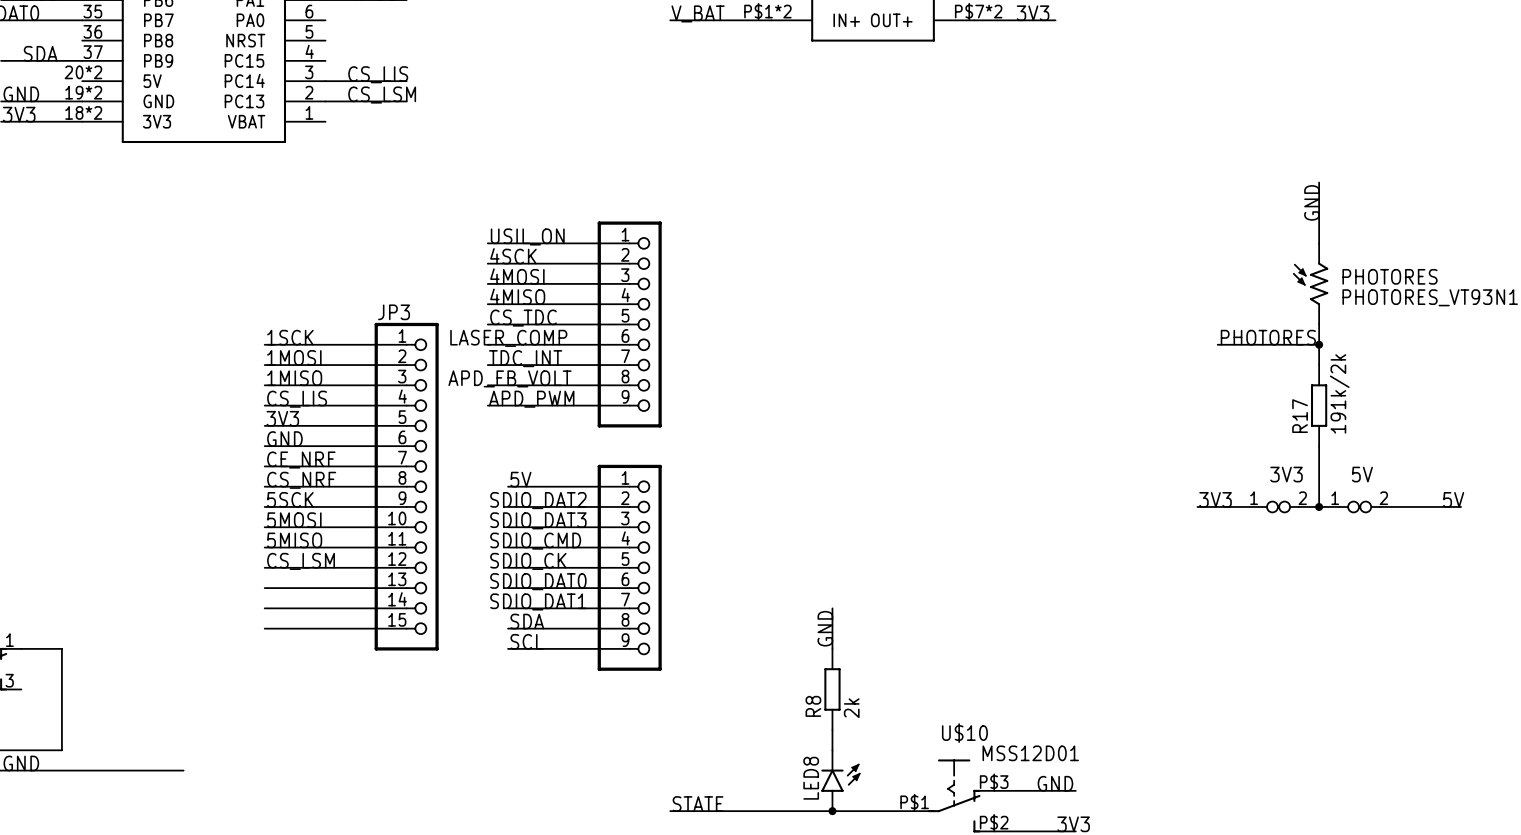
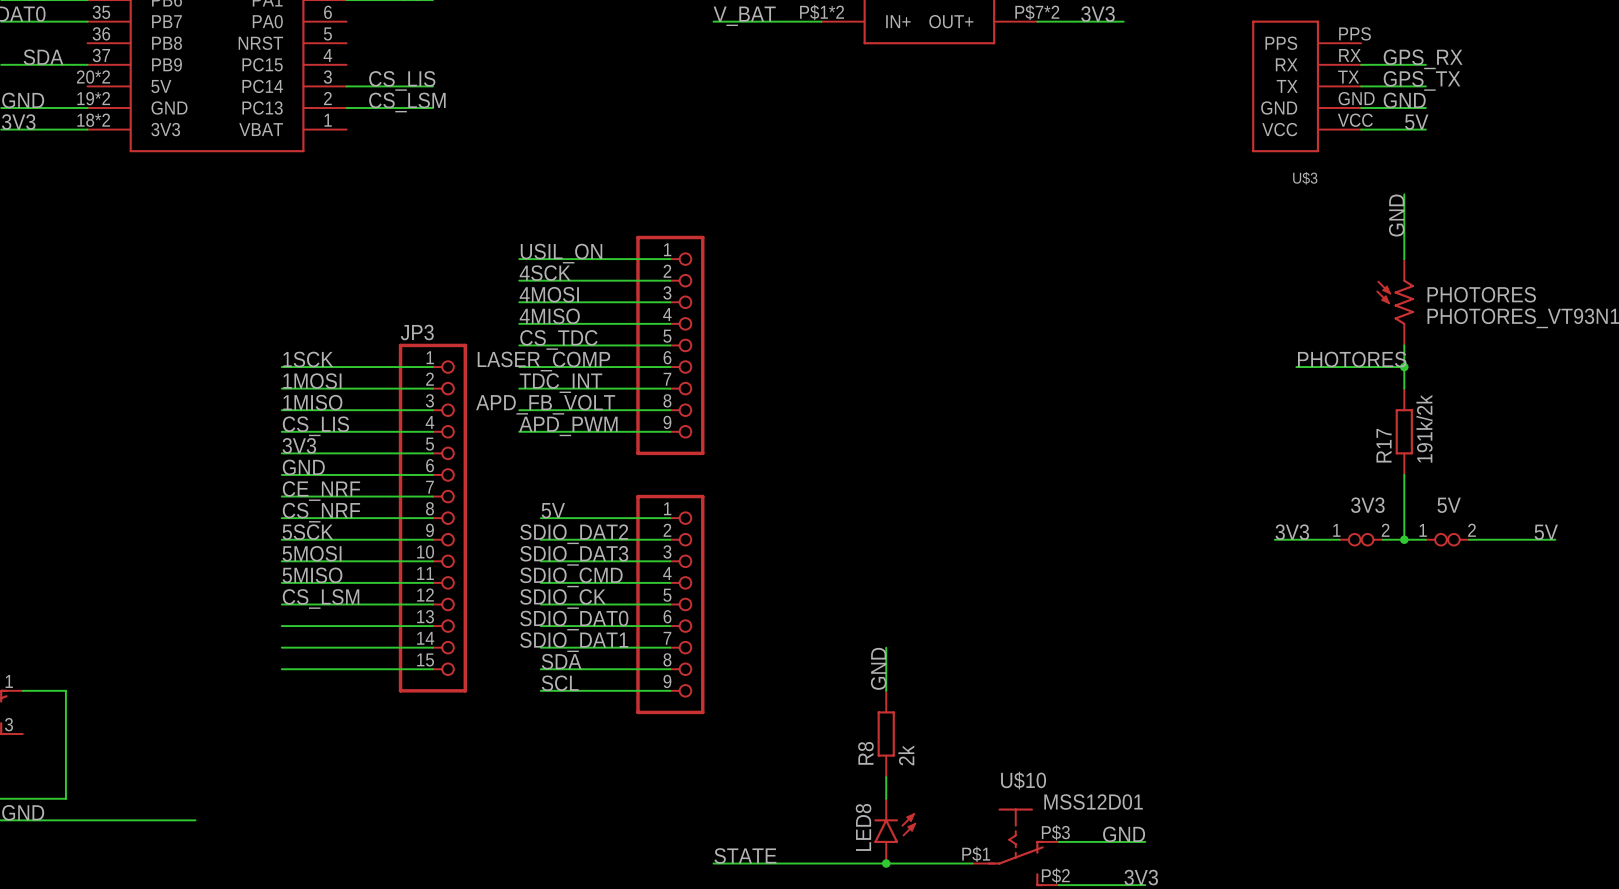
label: none -> GPS_RX (1423, 59)
wire: none -> (1361, 64) (1425, 64)
label: none -> GPS_TX (1422, 80)
U$3: none -> (1306, 86)
wire: none -> (1361, 86) (1425, 86)
label: none -> GND (1404, 100)
wire: none -> (1361, 107) (1425, 107)
label: none -> 5V (1416, 122)
wire: none -> (1361, 129) (1425, 129)

